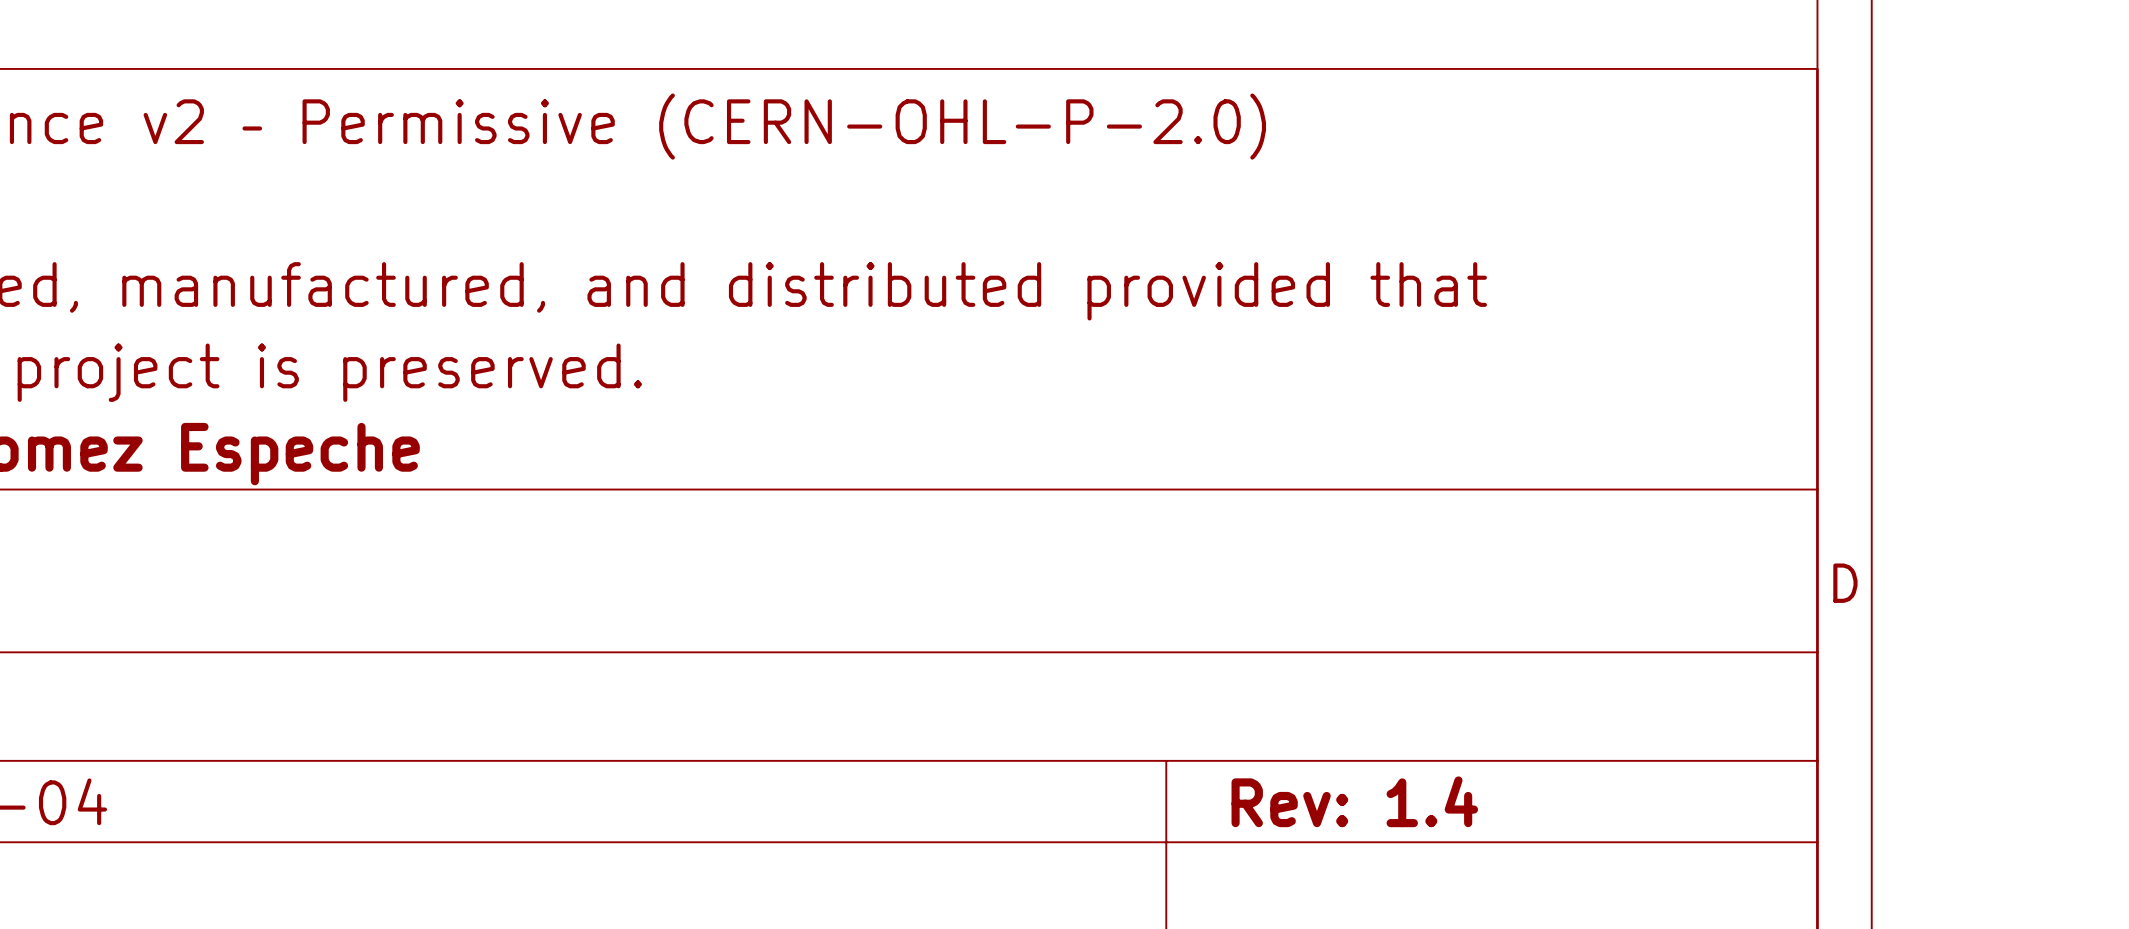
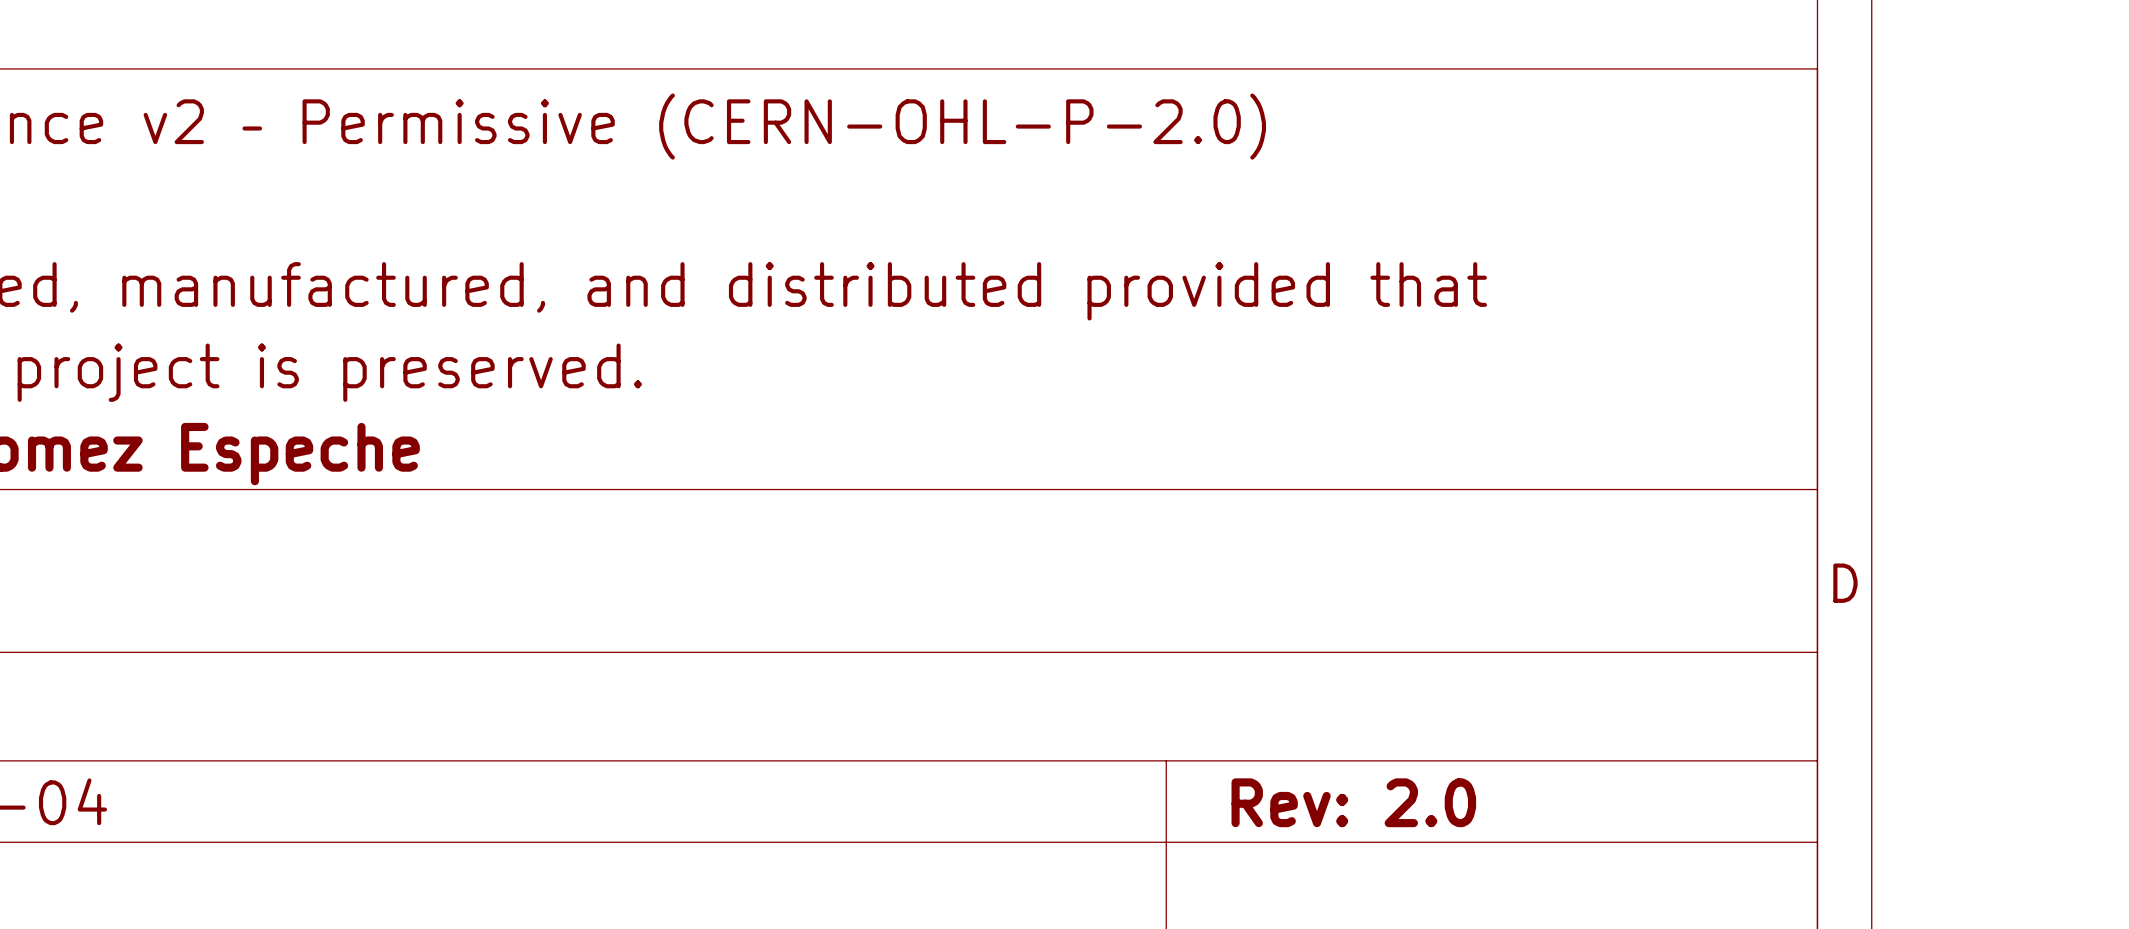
title block: Rev: 1.4 (1354, 801) -> Rev: 2.0 (1353, 802)

